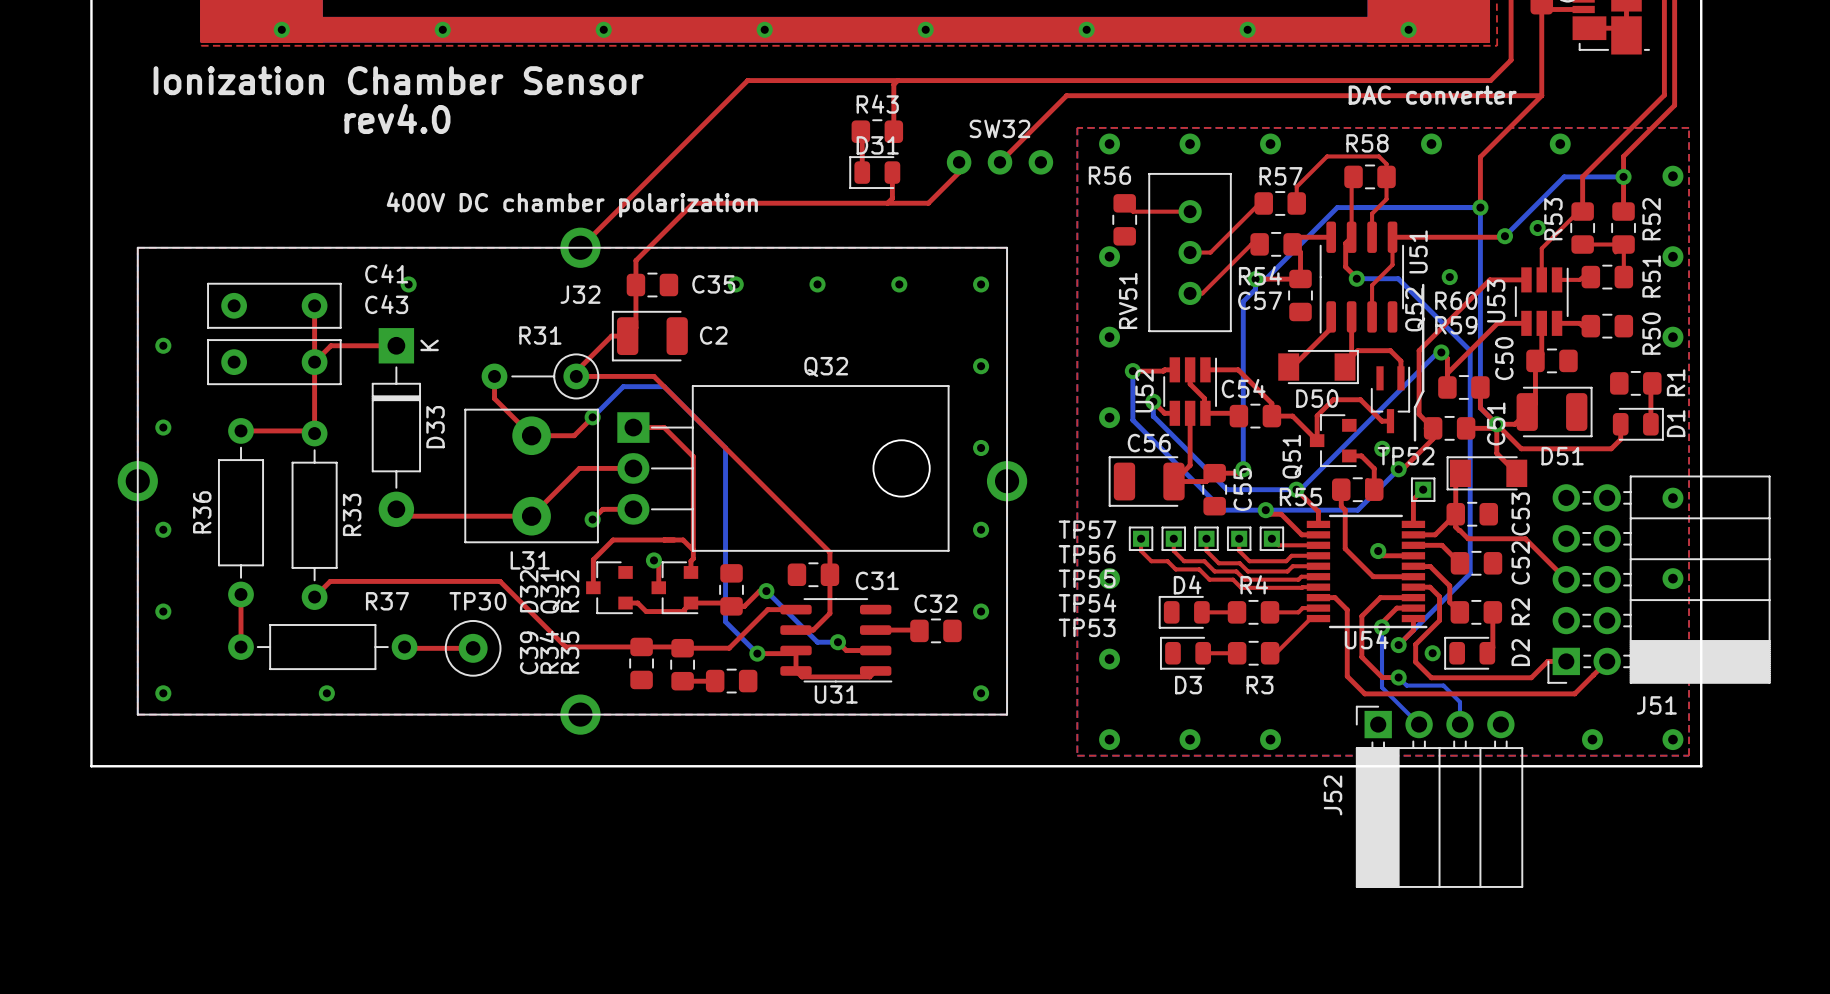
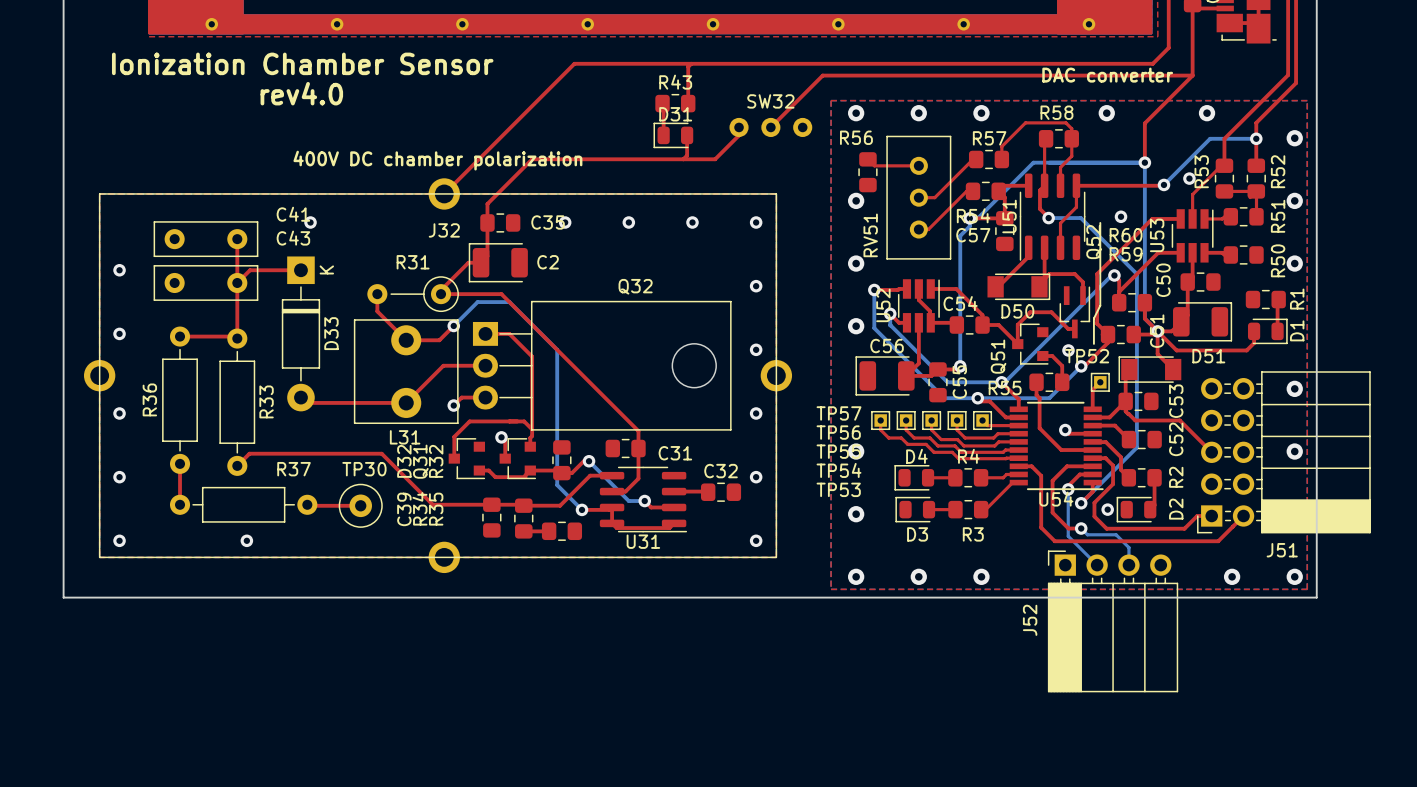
U51 name position: U51 (1418, 251) -> U51 (1009, 216)

